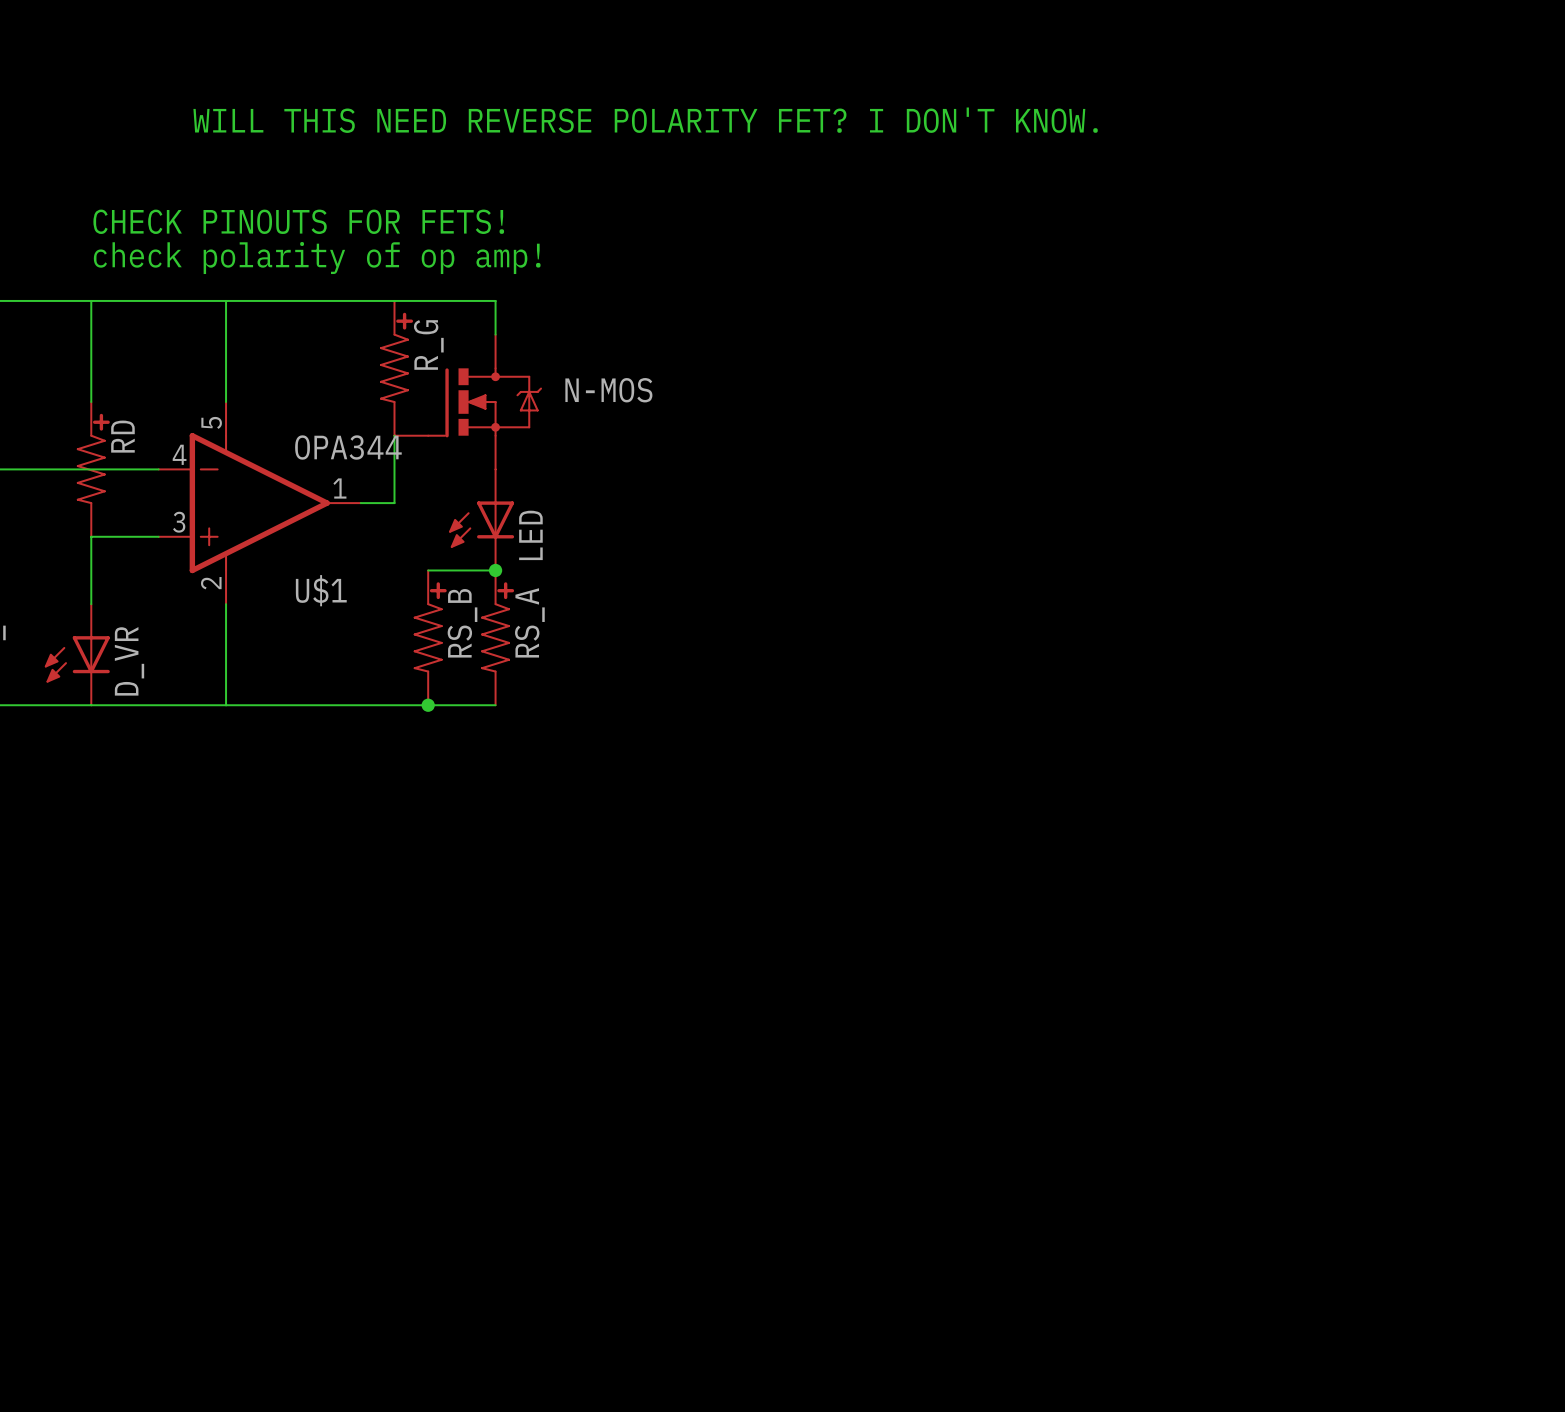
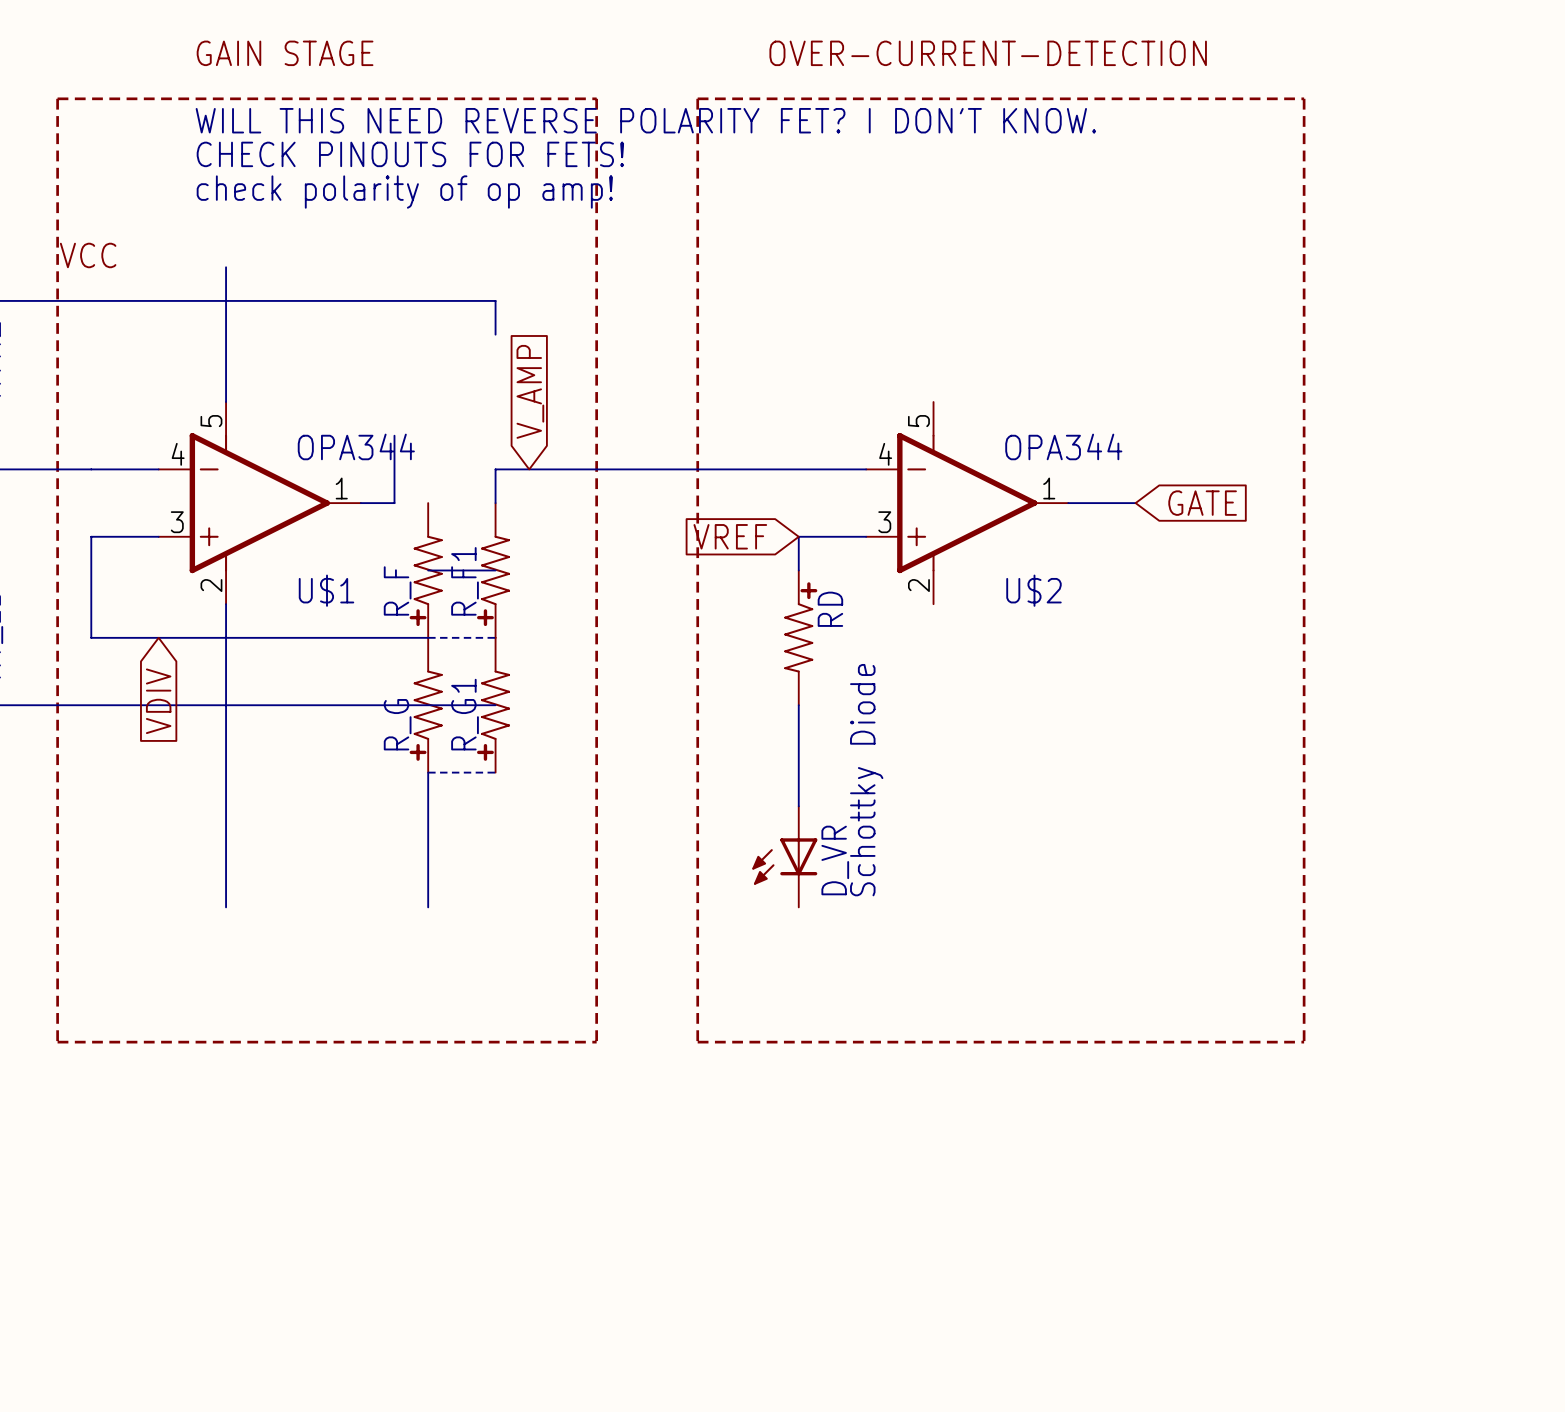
text: none -> GAIN STAGE (285, 53)
text: none -> OVER-CURRENT-DETECTION (988, 53)
line: none -> (57, 98) (596, 98) (596, 1042) (57, 1042) (57, 98)
line: none -> (697, 98) (1304, 98) (1304, 1042) (697, 1042) (697, 98)
text position: CHECK PINOUTS FOR FETS! (298, 221) -> CHECK PINOUTS FOR FETS! (410, 154)
label: none -> VCC (88, 255)
text position: check polarity of op amp! (317, 258) -> check polarity of op amp! (404, 192)
wire: none -> (226, 267) (226, 300)
wire: (91, 300) (91, 402) -> none
R_G: (396, 368) -> none
global label: none -> V_AMP (530, 391)
N-MOS: (468, 402) -> none
RD: (93, 469) -> none
wire: none -> (866, 469) (495, 469) (495, 503)
U$2: none -> OPA344 (967, 503)
wire: none -> (1068, 503) (1135, 503)
global label: none -> GATE (1202, 503)
LED: (481, 519) -> none
global label: none -> VREF (730, 536)
wire: none -> (866, 536) (798, 536) (798, 570)
R_F: none -> (426, 570)
R_F1: none -> (493, 570)
junction: (495, 570) -> none
wire: none -> (91, 604) (91, 637) (495, 637)
RS_B: (430, 637) -> none
RS_A: (497, 637) -> none
RD: none -> (800, 637)
D_VR: (77, 654) -> none
global label: none -> VDIV (158, 701)
wire: none -> (226, 705) (226, 907)
R_G: none -> (426, 705)
junction: (428, 705) -> none
R_G1: none -> (493, 705)
wire: none -> (798, 705) (798, 806)
wire: none -> (495, 772) (428, 772) (428, 907)
D_VR: none -> Schottky Diode (784, 856)

